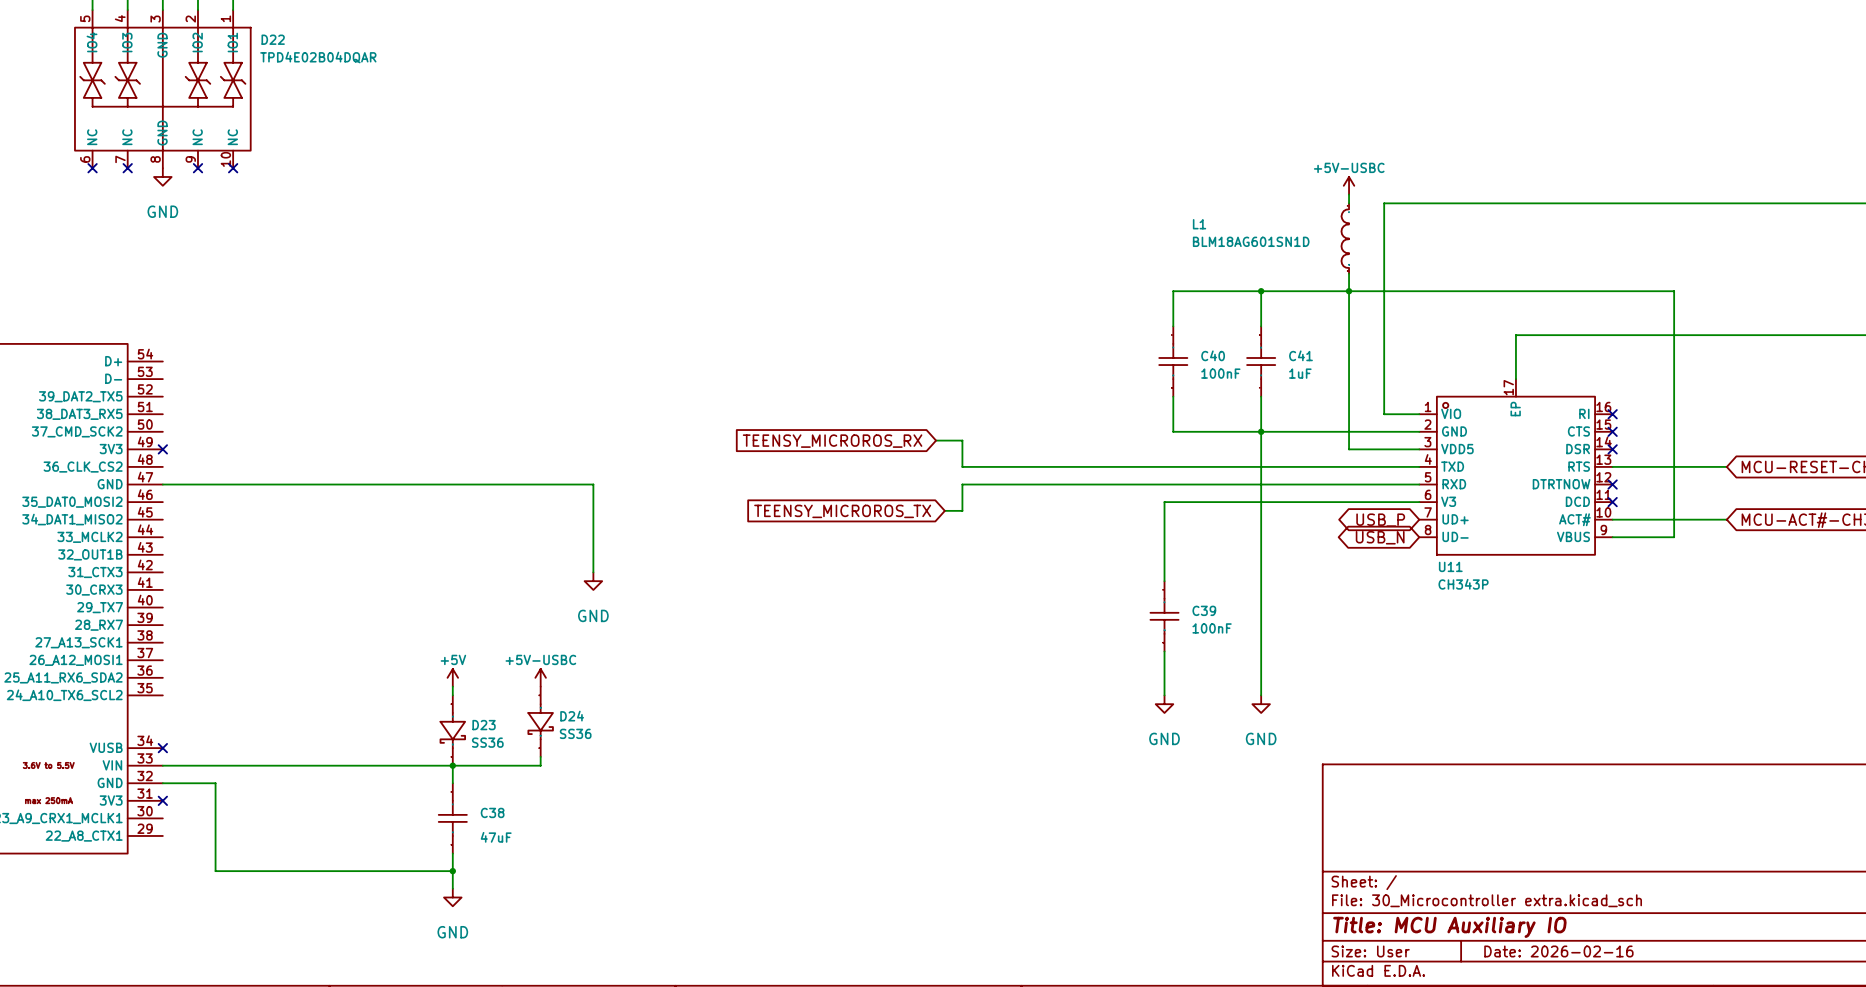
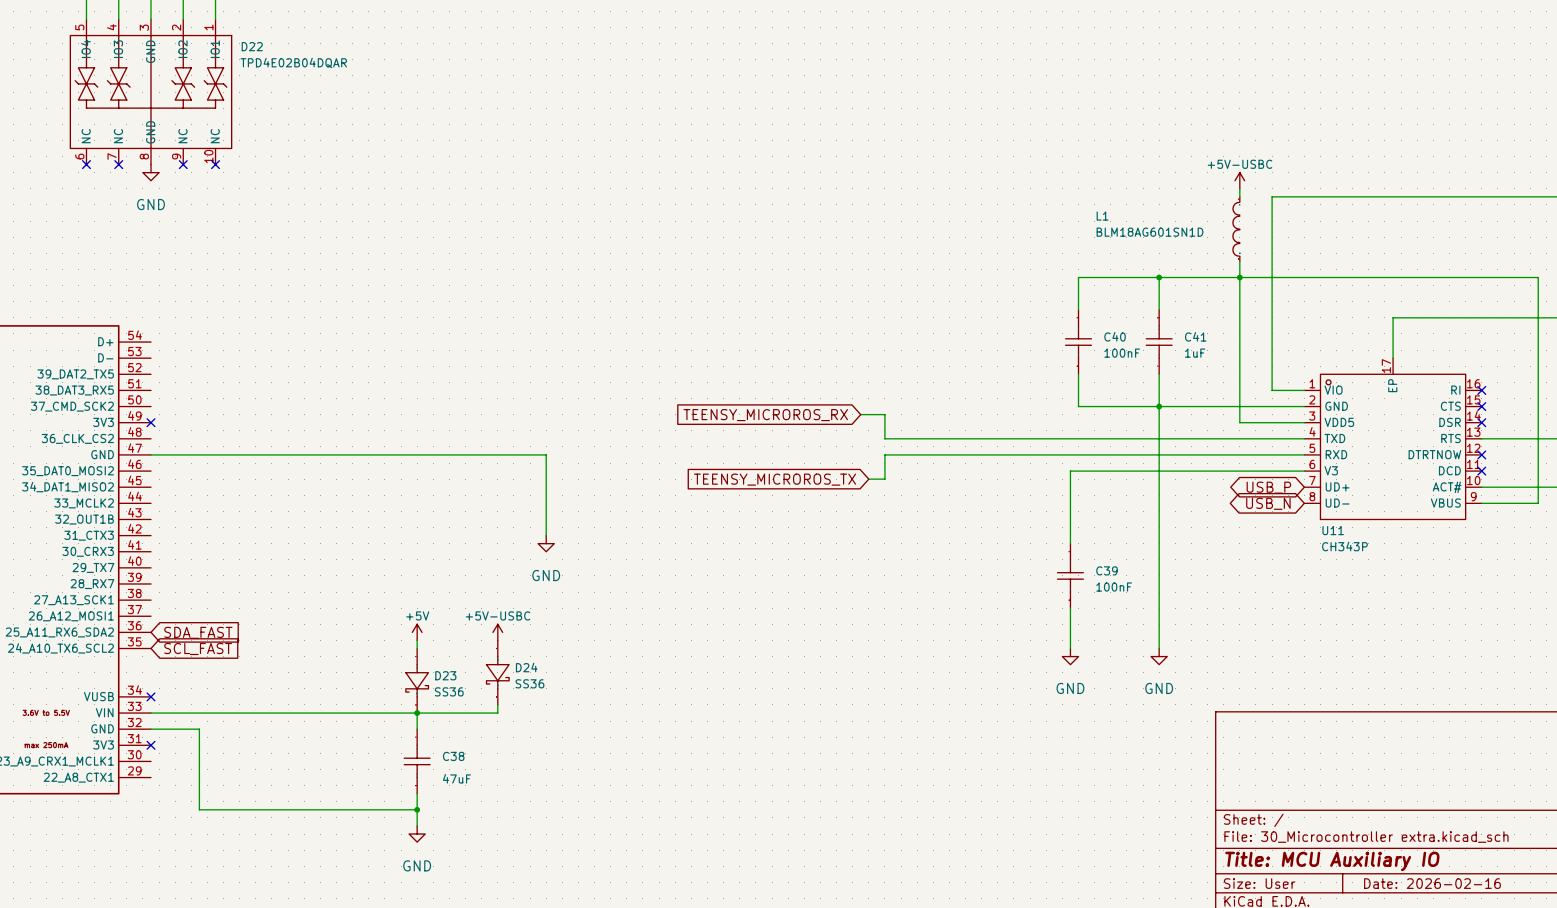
global label: none -> SDA_FAST (198, 632)
global label: none -> SCL_FAST (198, 648)

